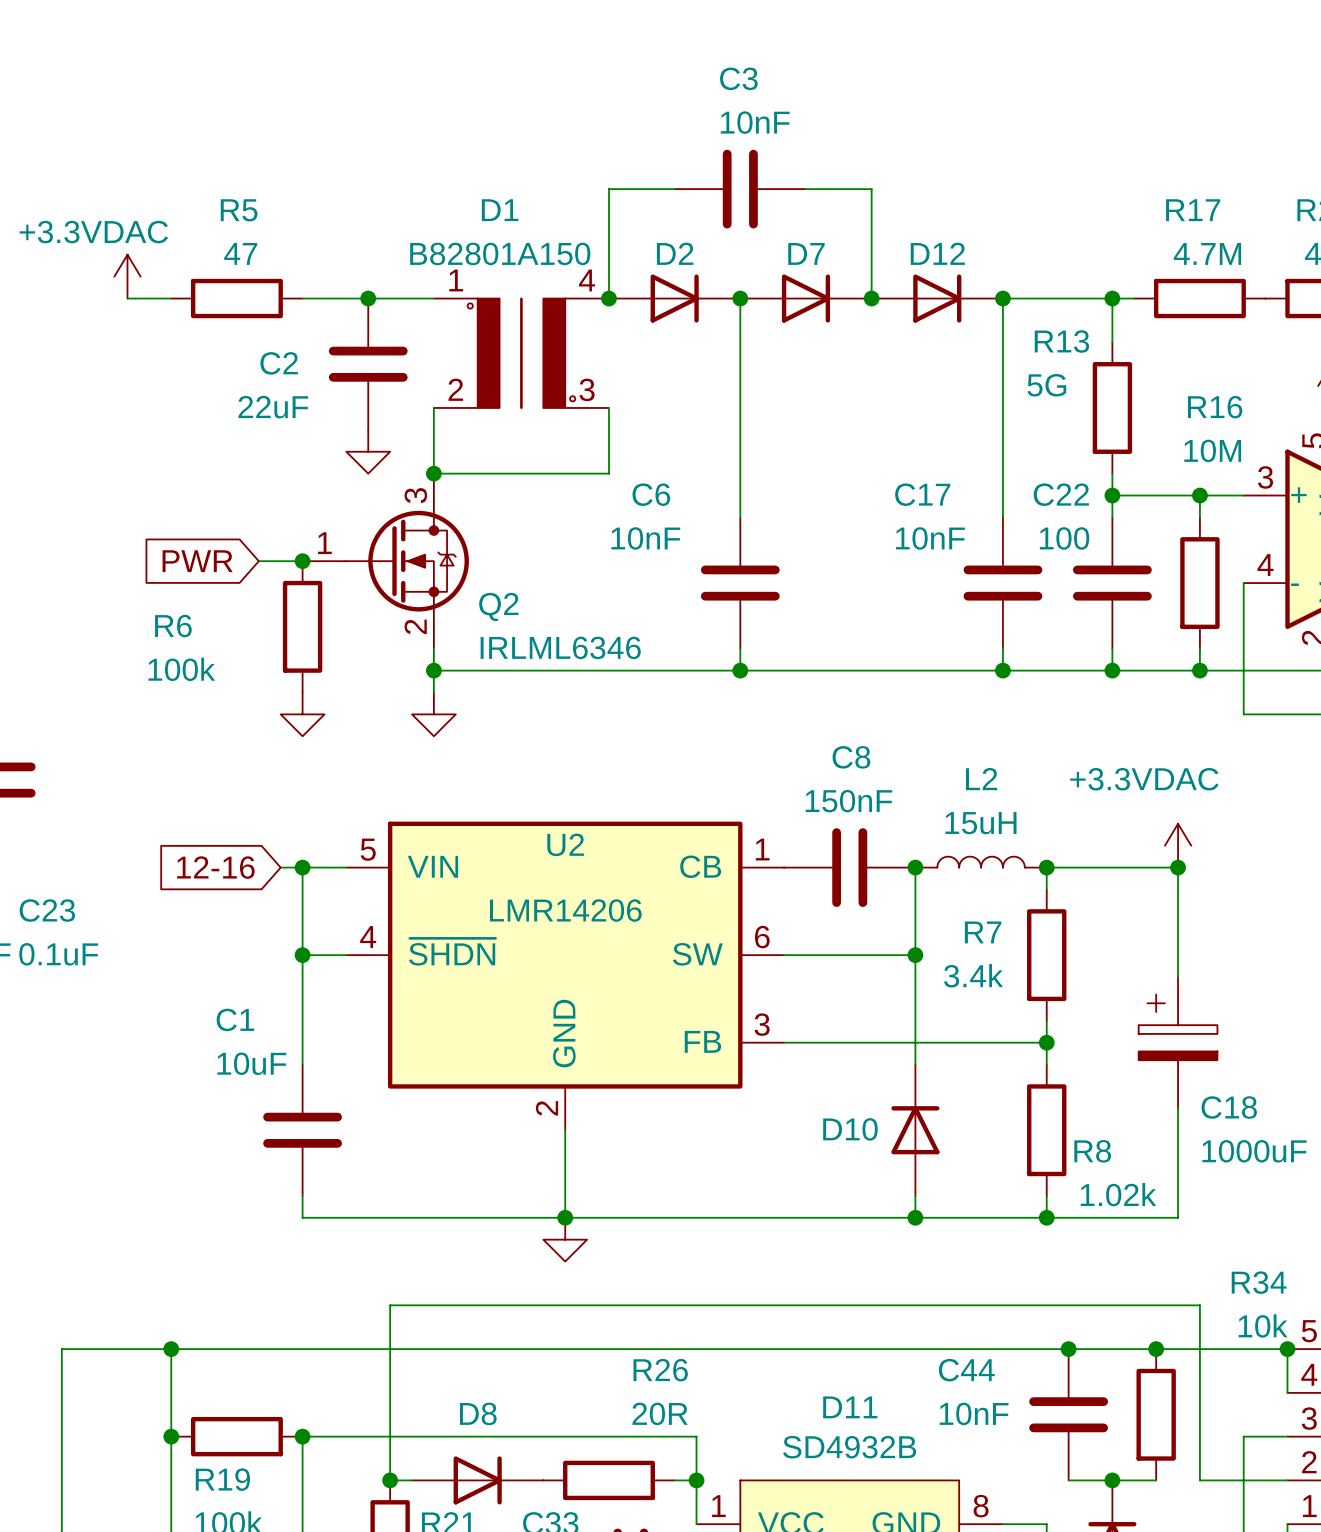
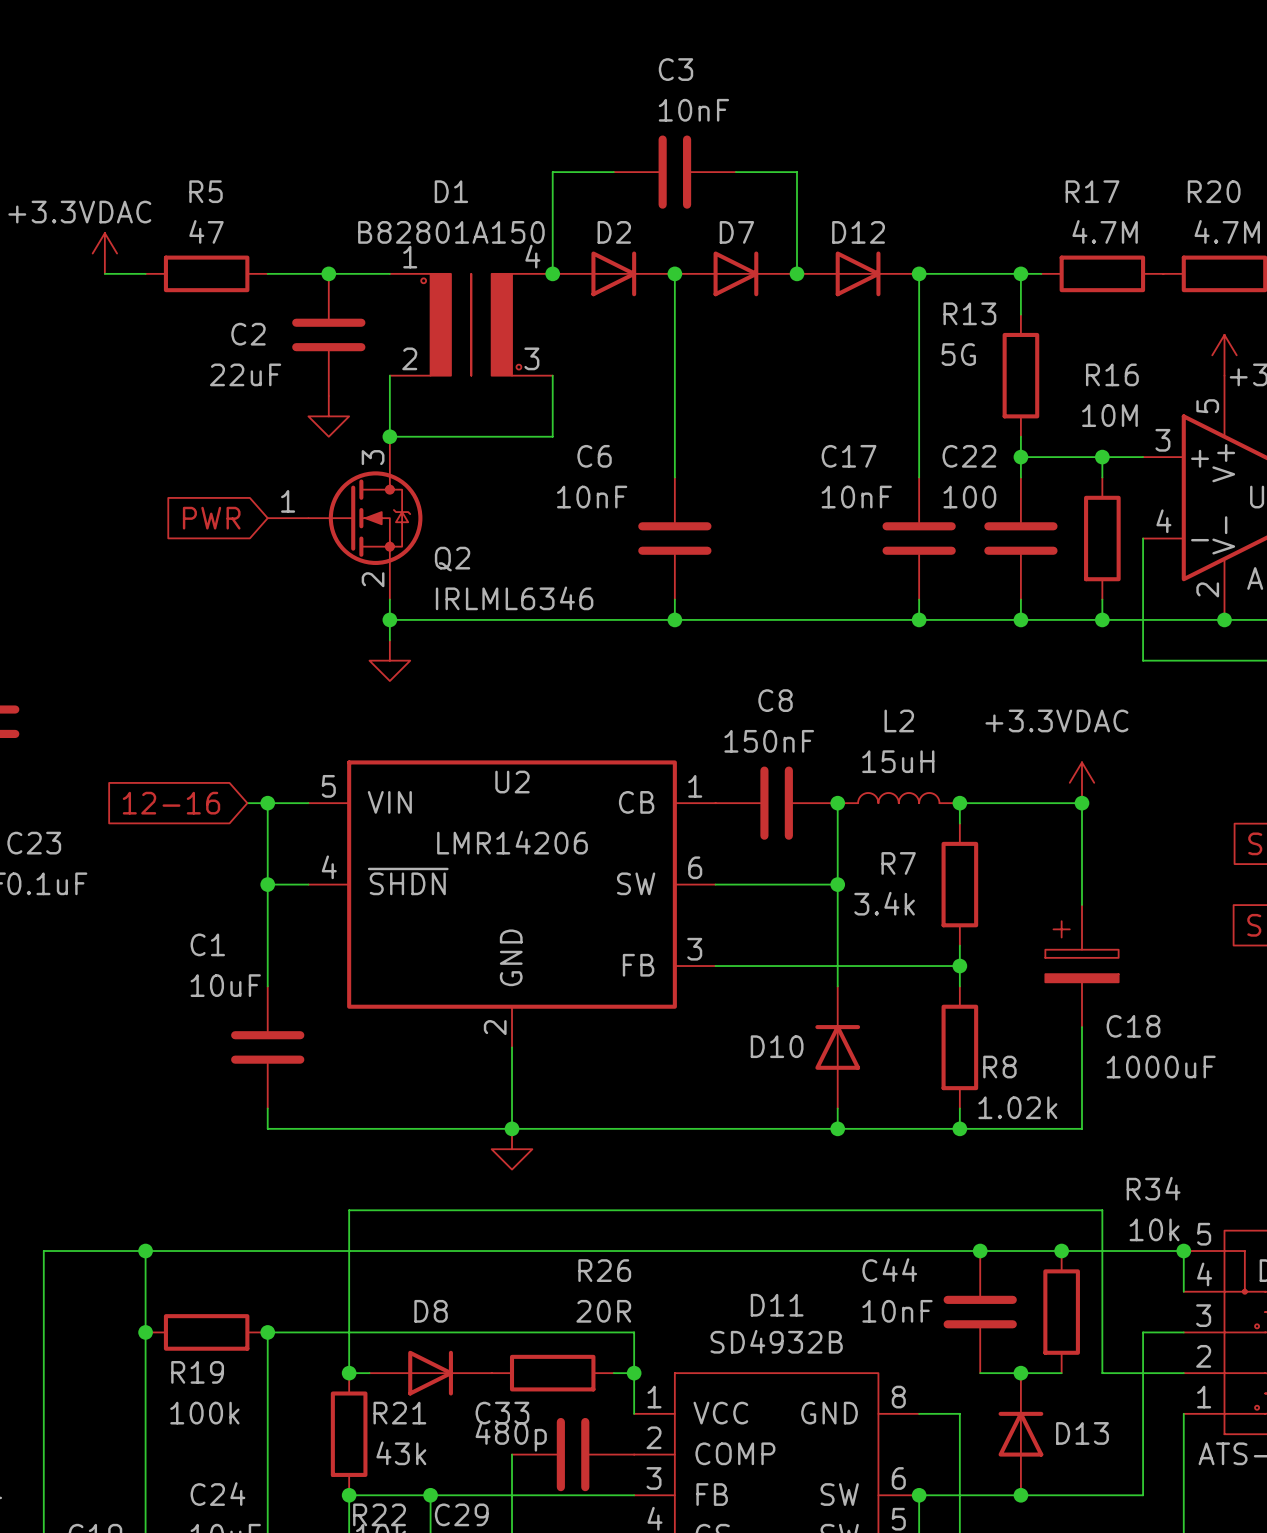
global label position: PWR (197, 561) -> PWR (211, 518)
wire: (258, 561) (302, 561) -> none
junction: (302, 561) -> none
R6: 100k (302, 626) -> none
power symbol: (302, 714) -> none

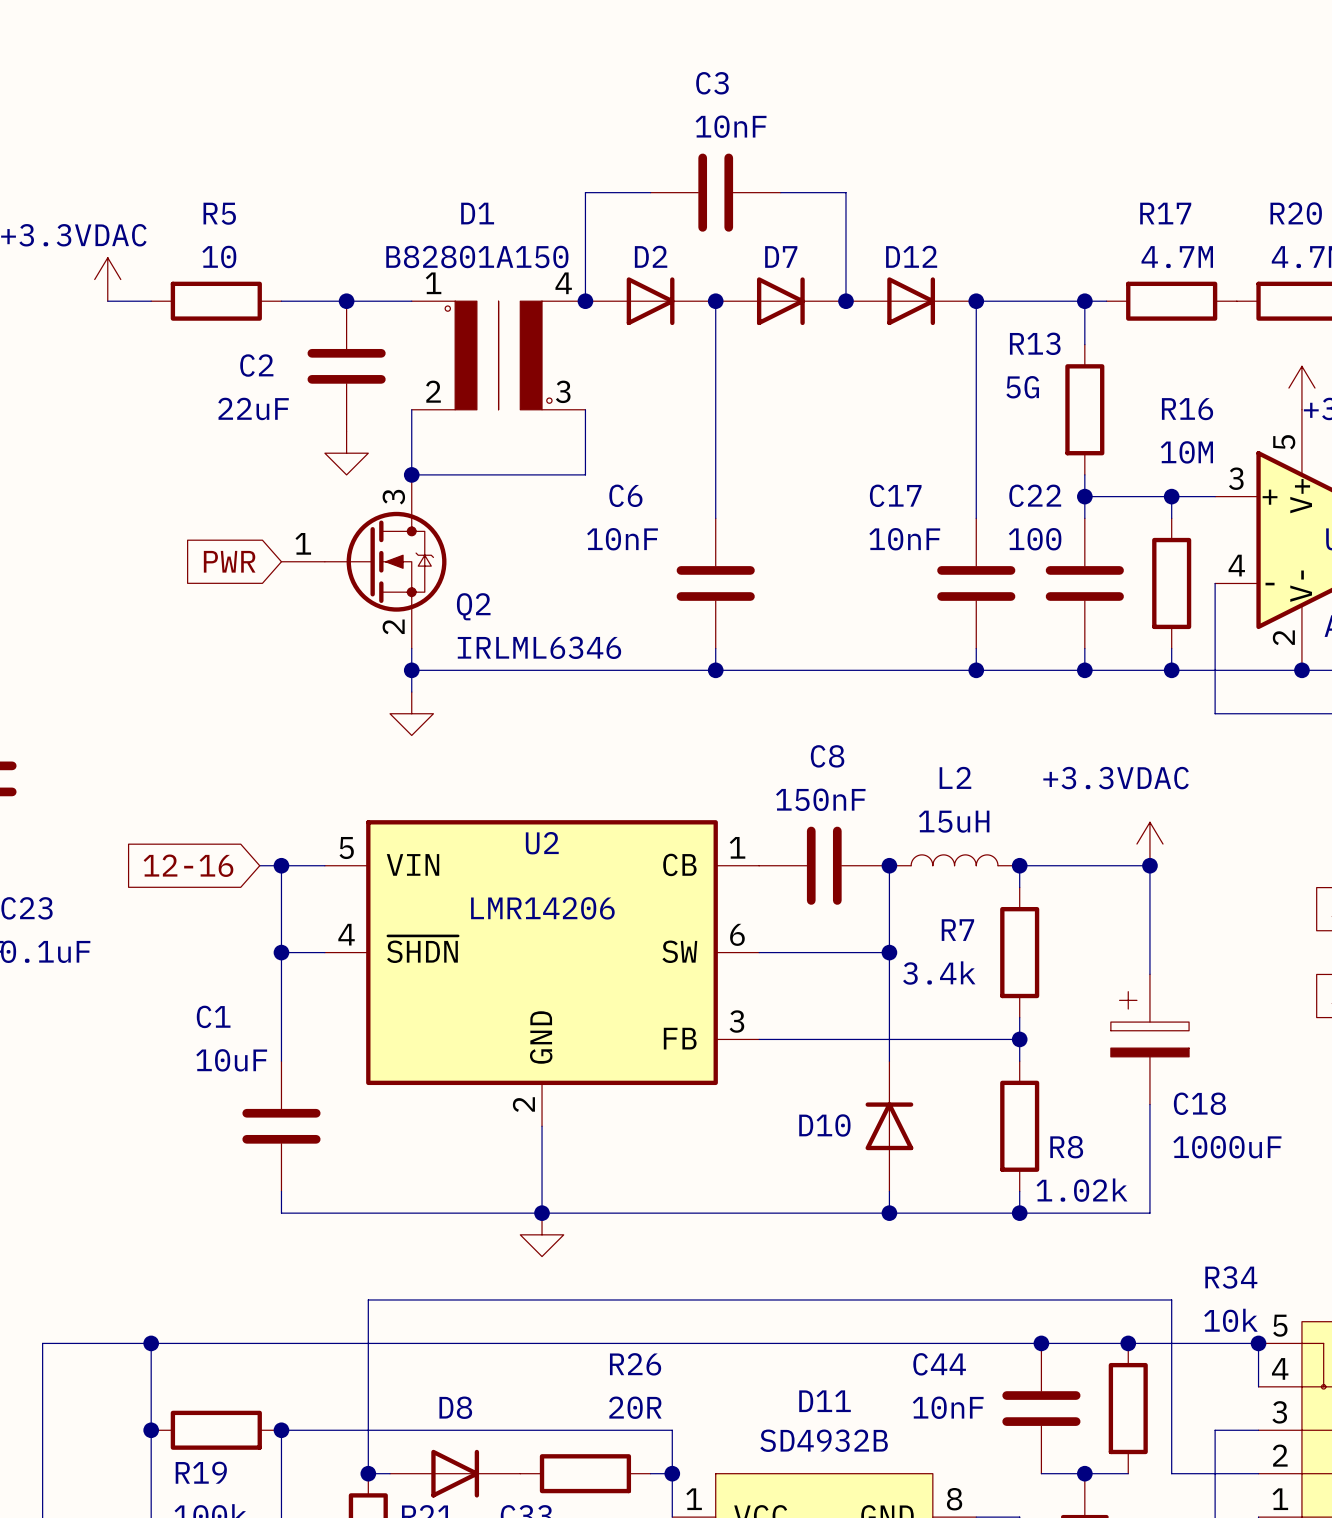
R5 value: 47 (206, 231) -> 10 (219, 256)

